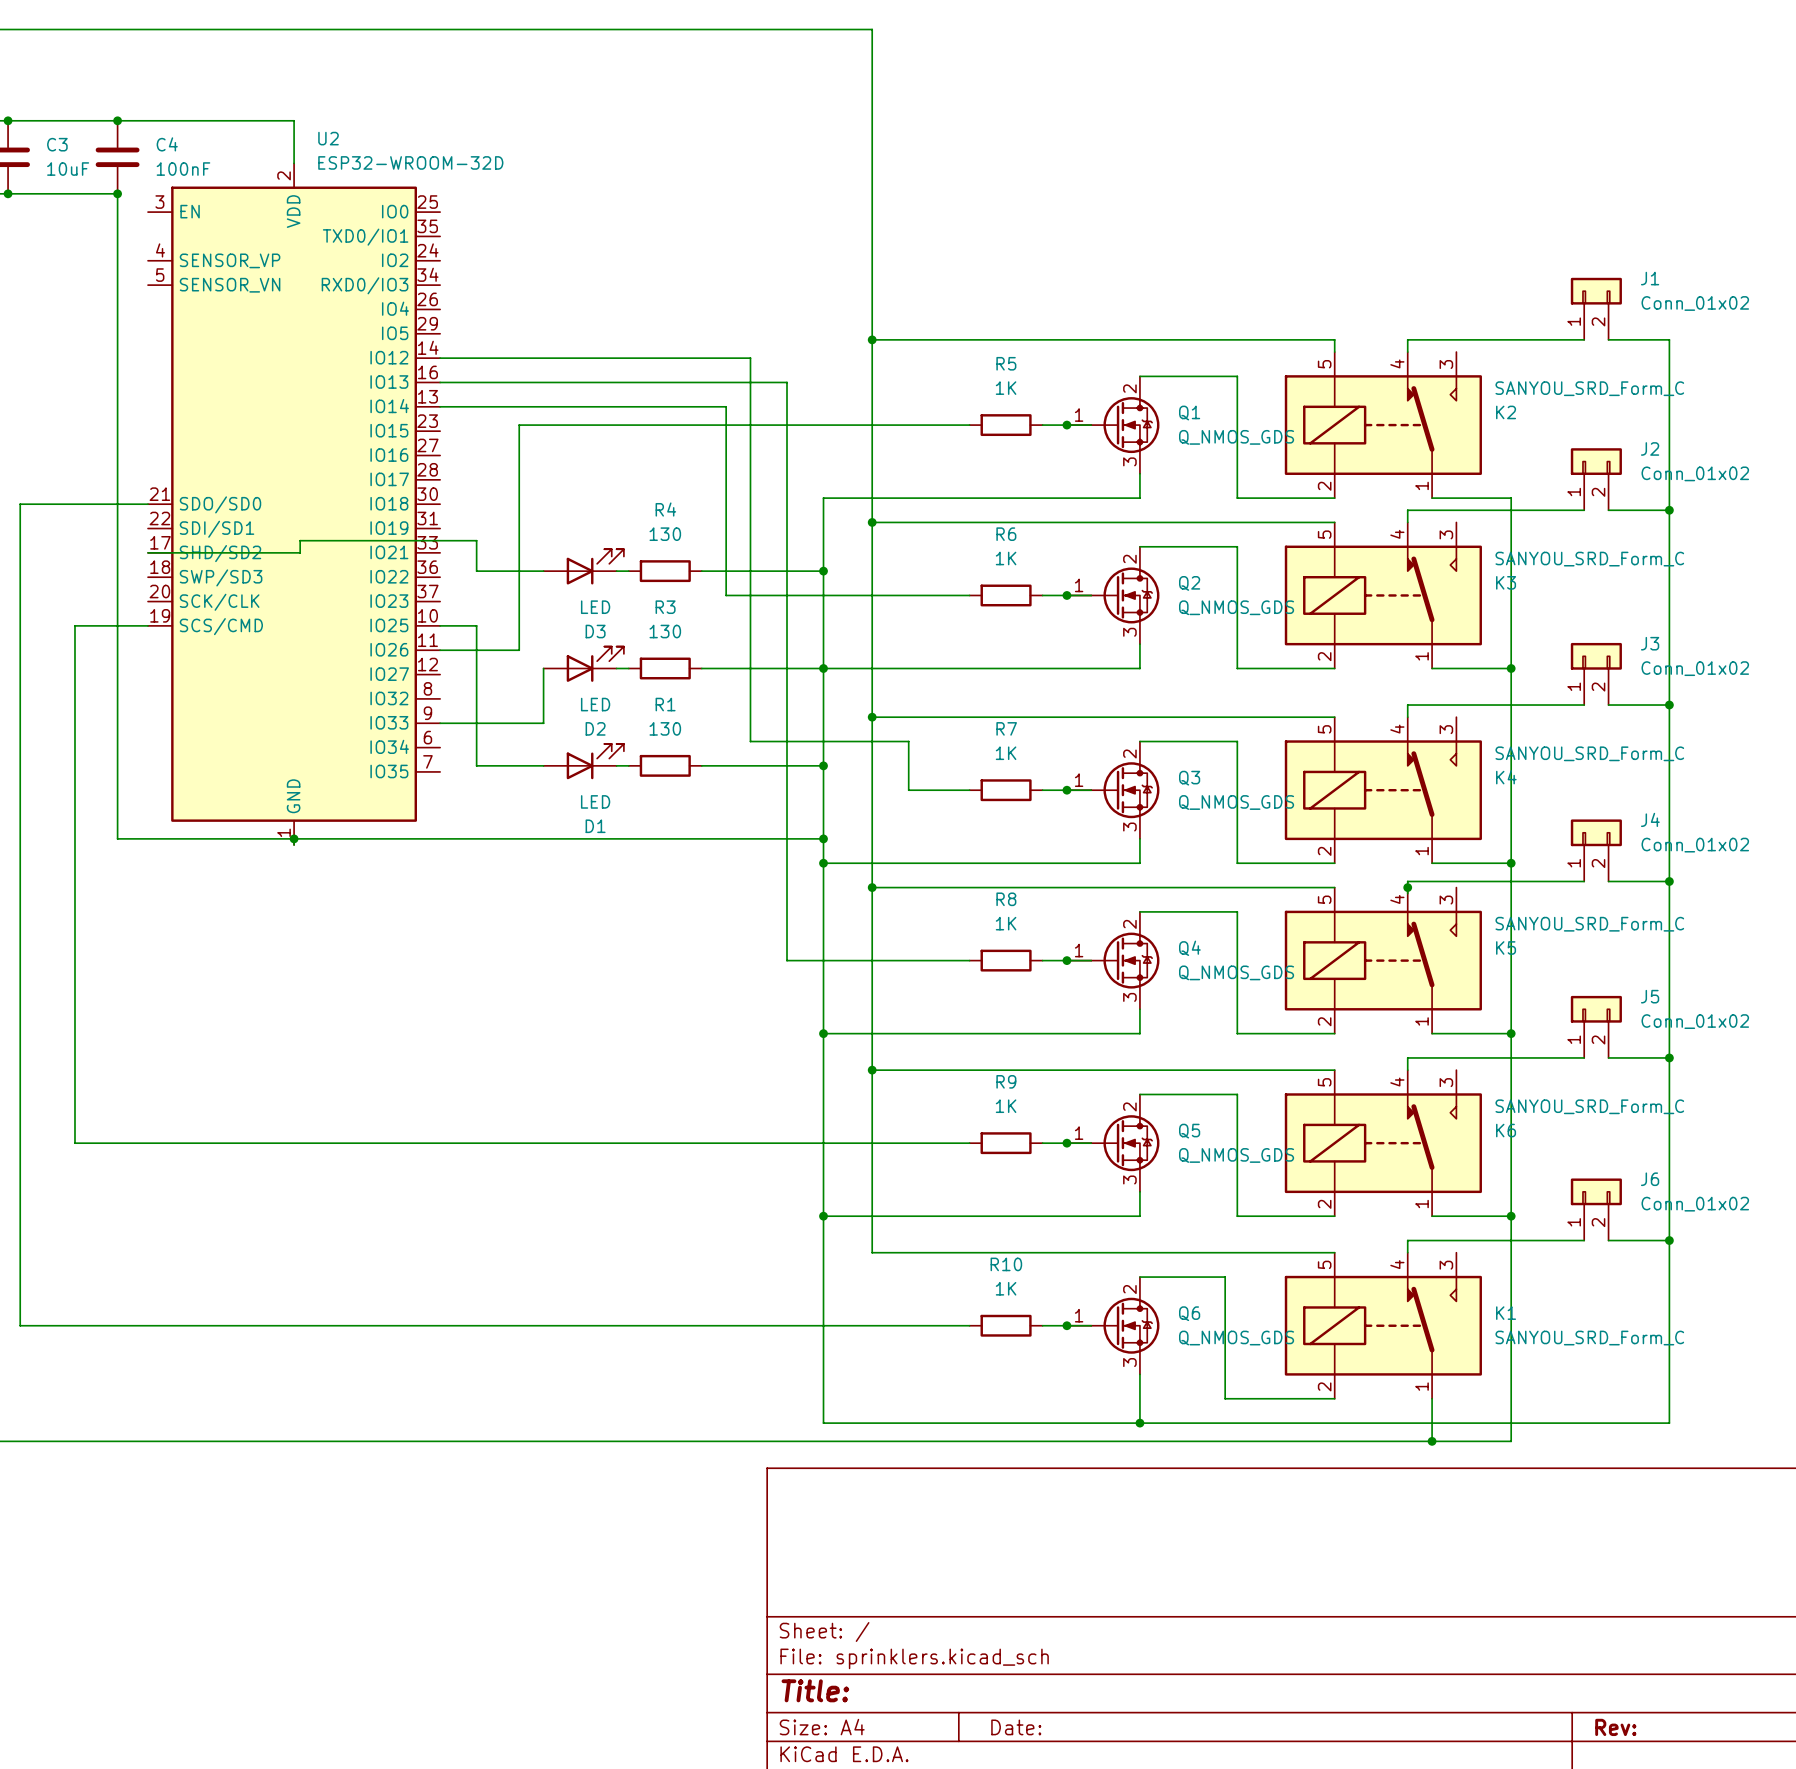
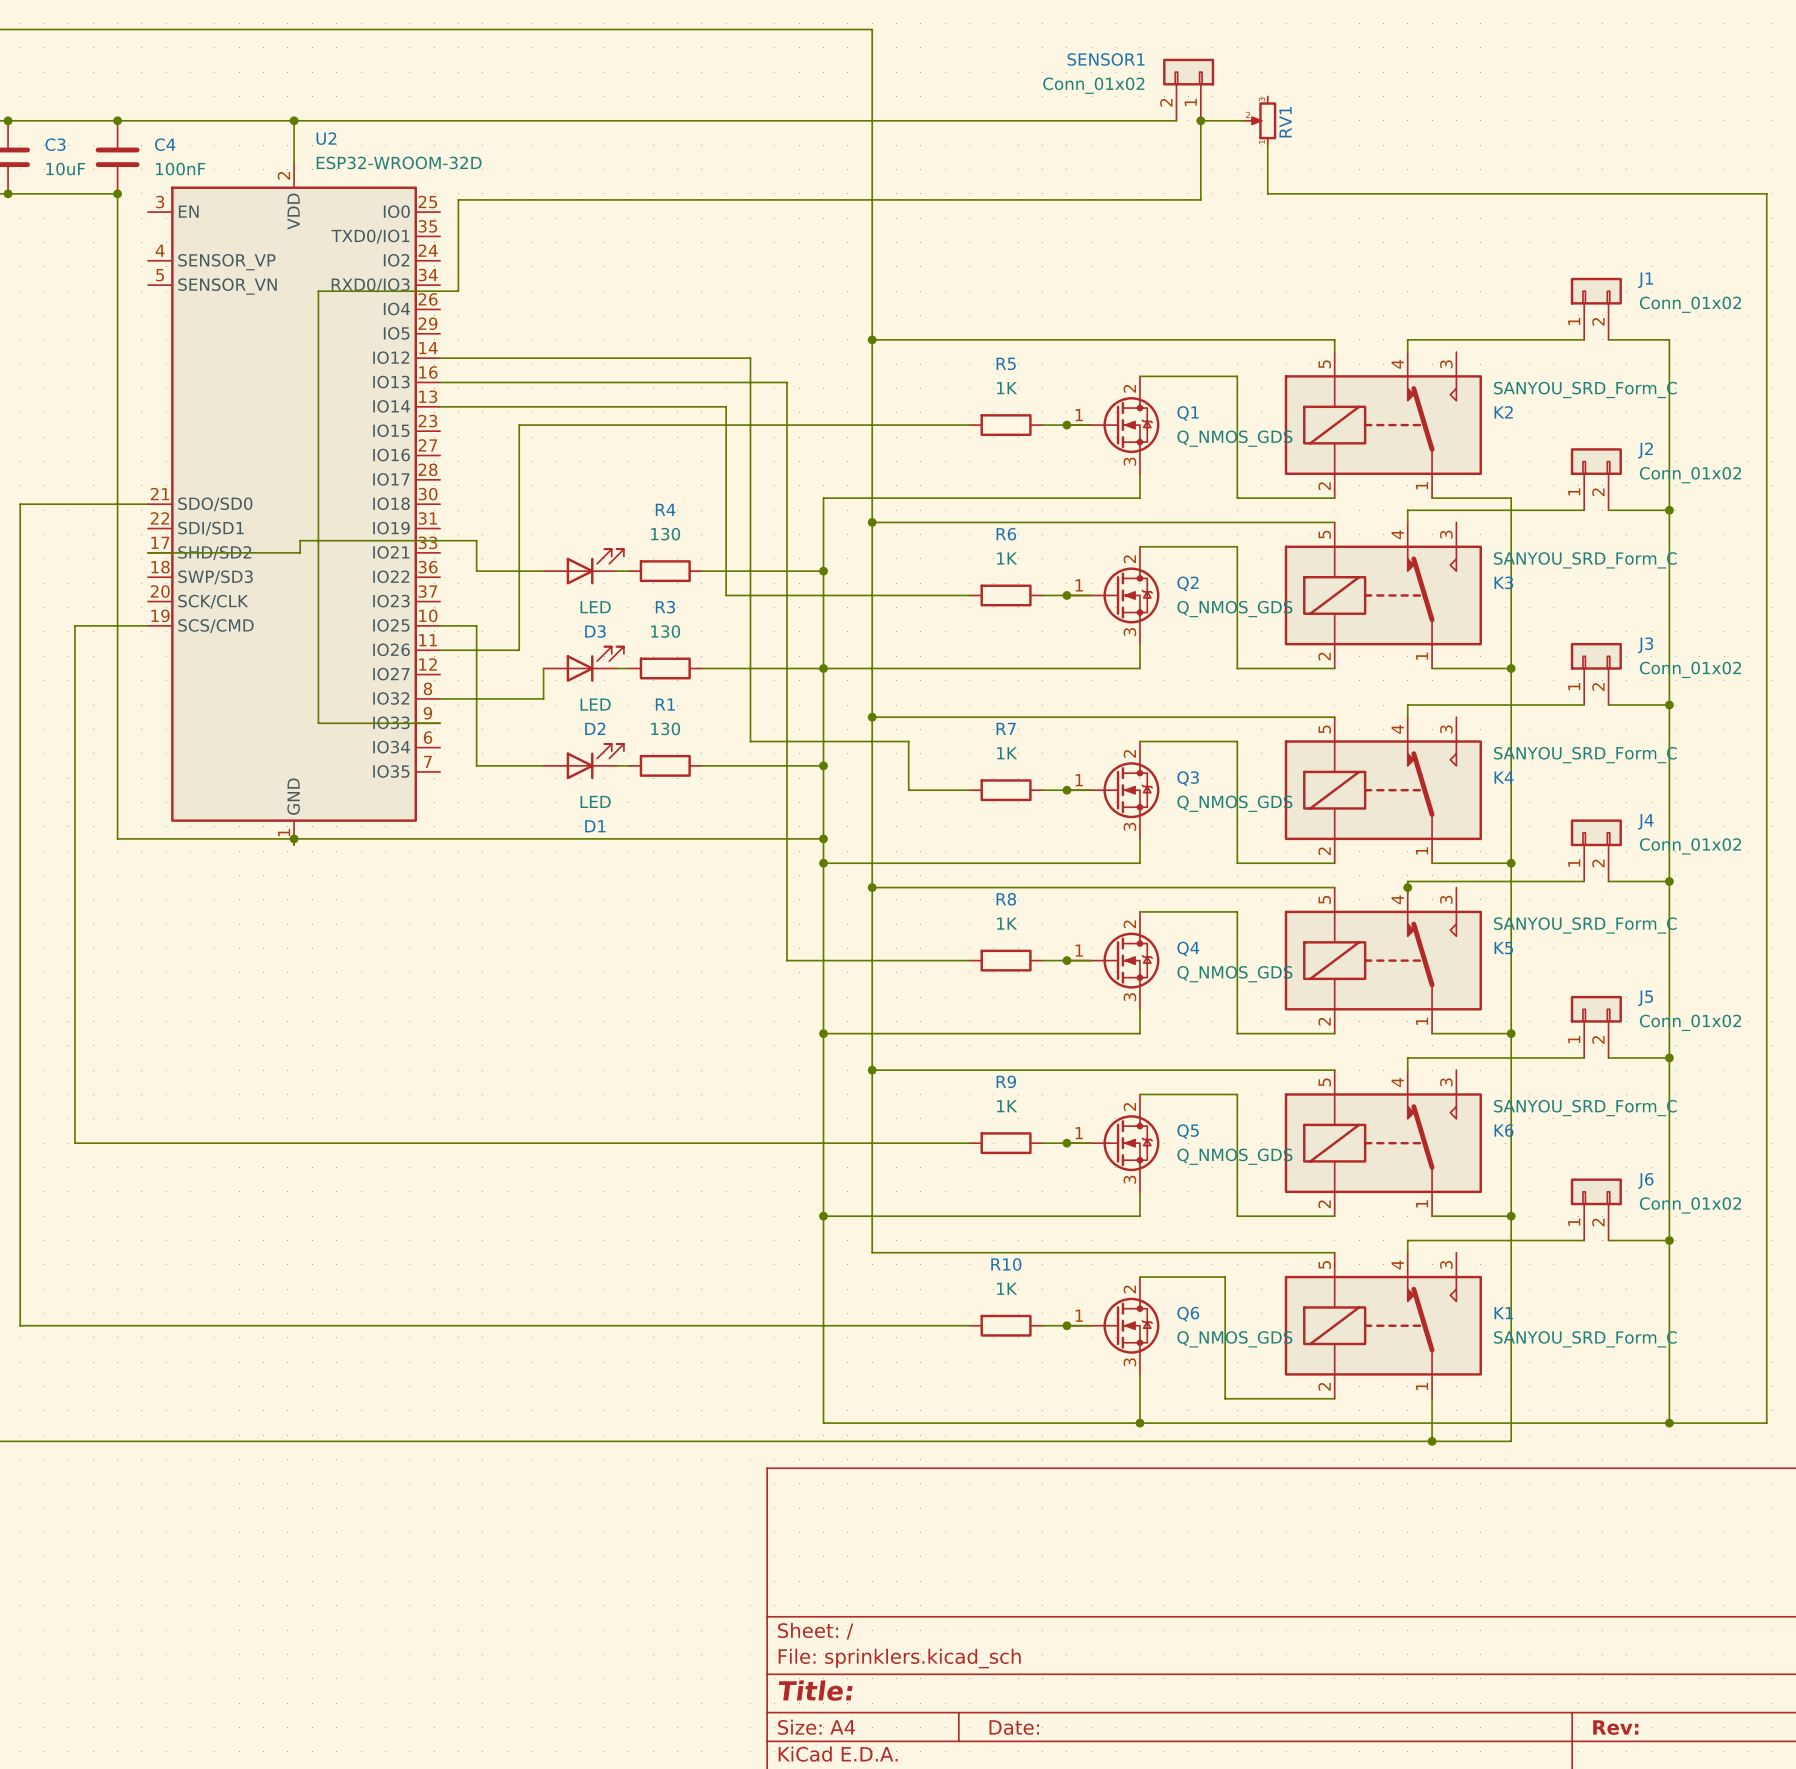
SENSOR1: none -> Conn_01x02 (1188, 89)
wire: none -> (294, 120) (1176, 120)
junction: none -> (294, 120)
junction: none -> (1200, 120)
wire: none -> (1243, 120) (1200, 120) (1200, 199) (458, 199) (458, 291) (318, 291) (318, 723) (440, 723)
RV1: none -> (1259, 120)
wire: none -> (1267, 145) (1267, 193) (1766, 193) (1766, 1423) (1669, 1423)
wire: (543, 698) (543, 723) (440, 723) -> (543, 698) (440, 698)
junction: none -> (1669, 1423)

